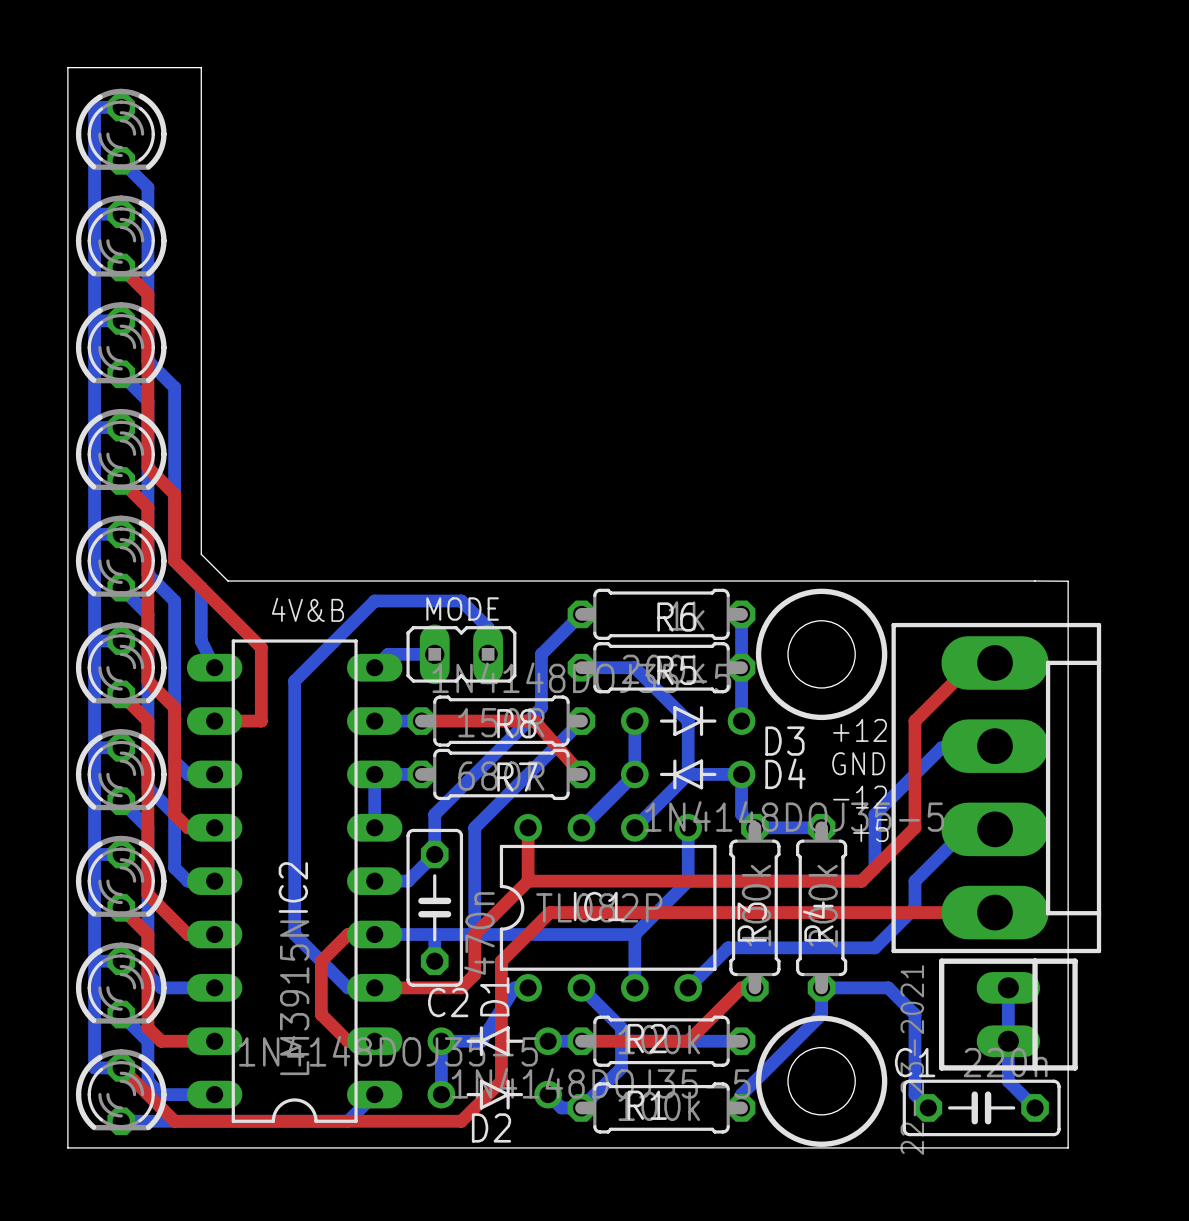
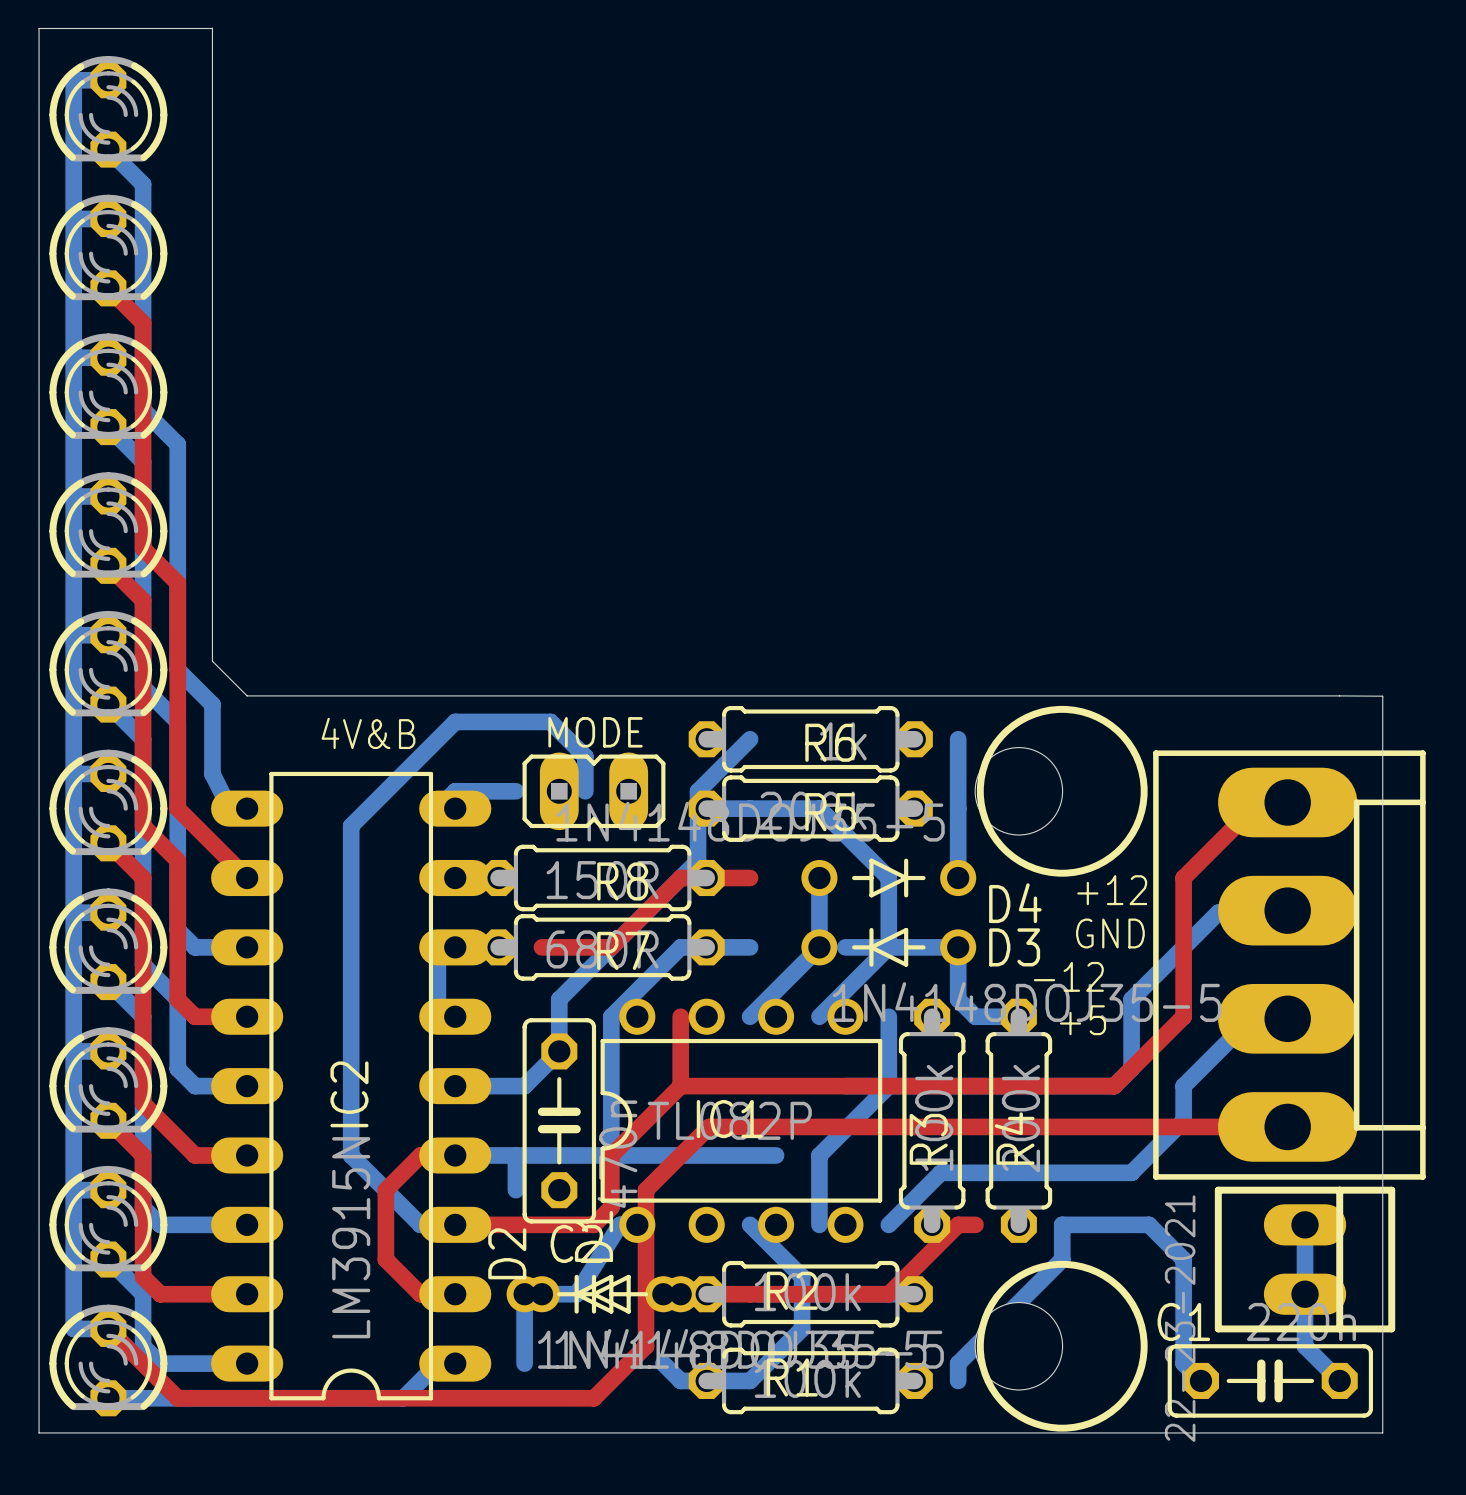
top track: (174, 560) (261, 647) (261, 721) (214, 721) -> (177, 669) (177, 808) (247, 878)
board edge: (1035, 581) (1068, 581) (1068, 1147) -> (1296, 695) (1382, 696) (1382, 1432) (1339, 1432)
bottom track: (388, 601) (374, 601) (294, 681) (294, 934) (348, 987) (361, 987) -> (455, 721) (351, 825) (351, 1155) (420, 1224)
text position: 4V&B (307, 609) -> 4V&B (368, 733)
bottom track: (581, 614) (541, 654) (541, 707) (434, 814) (434, 854) (408, 881) -> (750, 739) (698, 791) (698, 860) (559, 999) (559, 1051) (524, 1086) (481, 1086)
bottom track: (741, 614) (741, 721) -> (958, 739) (958, 878)
MODE position: (461, 654) -> (593, 791)
drawing position: (821, 654) -> (1062, 791)
top track: (995, 662) (973, 662) (914, 721) (914, 827) (861, 881) -> (1287, 802) (1259, 802) (1183, 878) (1183, 1016) (1114, 1086) (1070, 1086)
bottom track: (634, 667) (688, 721) (688, 774) (634, 827) -> (776, 808) (819, 808) (888, 878) (888, 947) (819, 1016)
top track: (421, 721) (534, 721) (581, 774) -> none
bottom track: (581, 721) (474, 827) (474, 934) -> none
top track: none -> (750, 878) (680, 878) (611, 947) (541, 947)
bottom track: (634, 721) (634, 774) (581, 827) -> (819, 878) (819, 947) (750, 1016)
D3 rotation: 0° (688, 721) -> 180° (888, 947)
text position: +12 (860, 730) -> +12 (1112, 890)
bottom track: (975, 747) (941, 747) (874, 814) (874, 867) (861, 881) -> (1218, 912) (1131, 999) (1131, 1068) (1114, 1086) (1070, 1086)
text position: GND (858, 763) -> GND (1110, 933)
bottom track: none -> (750, 947) (680, 947) (611, 1016) (611, 1155)
D4 rotation: 0° (688, 774) -> 180° (888, 878)
bottom track: (741, 774) (741, 814) (754, 827) (788, 827) -> (914, 947) (958, 947) (958, 999) (975, 1016)
part position: (996, 788) -> (1289, 965)
top track: (528, 827) (528, 881) -> none
bottom track: (688, 827) (688, 881) (634, 934) (634, 987) -> (888, 1016) (888, 1086) (819, 1155) (819, 1224)
bottom track: (995, 829) (966, 829) (914, 881) (914, 907) (874, 947) -> (1287, 1018) (1250, 1018) (1183, 1086) (1183, 1120) (1131, 1172) (1088, 1172)
IC2 position: (294, 881) -> (351, 1086)
top track: (528, 881) (474, 934) (474, 974) (461, 987) -> (680, 1016) (680, 1086) (611, 1155) (611, 1207) (593, 1224) (550, 1224)
top track: (528, 881) (561, 881) -> none
C2 position: (434, 907) -> (559, 1120)
top track: (583, 912) (550, 912) (501, 961) (501, 1081) (461, 1121) -> (709, 1126) (646, 1190) (646, 1346) (593, 1398) (550, 1398)
top track: (361, 934) (348, 934) (321, 961) (321, 1014) (348, 1041) (361, 1041) -> (420, 1155) (385, 1190) (385, 1259) (420, 1294)
bottom track: (761, 947) (728, 947) (688, 987) -> (940, 1172) (888, 1224)
bottom track: (581, 987) (621, 1027) (621, 1067) (581, 1107) -> (750, 1224) (802, 1276) (802, 1328) (750, 1380) (706, 1380)
top track: (754, 987) (741, 987) (688, 1041) -> (975, 1224) (958, 1224) (888, 1294) (845, 1294)
bottom track: (854, 987) (821, 987) (821, 1014) (741, 1094) (741, 1107) -> (1062, 1224) (1062, 1259) (958, 1363) (958, 1380)
bottom track: (888, 987) (914, 1014) (914, 1094) (928, 1107) -> (1105, 1224) (1148, 1224) (1183, 1259) (1183, 1363) (1200, 1380)
bottom track: (1008, 987) (1008, 1081) (1035, 1107) -> (1305, 1224) (1305, 1346) (1339, 1380)
part position: (1008, 1014) -> (1305, 1259)
drawing position: (821, 1081) -> (1062, 1346)
D2 rotation: 0° (494, 1094) -> 180° (611, 1294)
C1 position: (981, 1107) -> (1270, 1380)
D2 name position: D2 (491, 1127) -> D2 (507, 1253)

